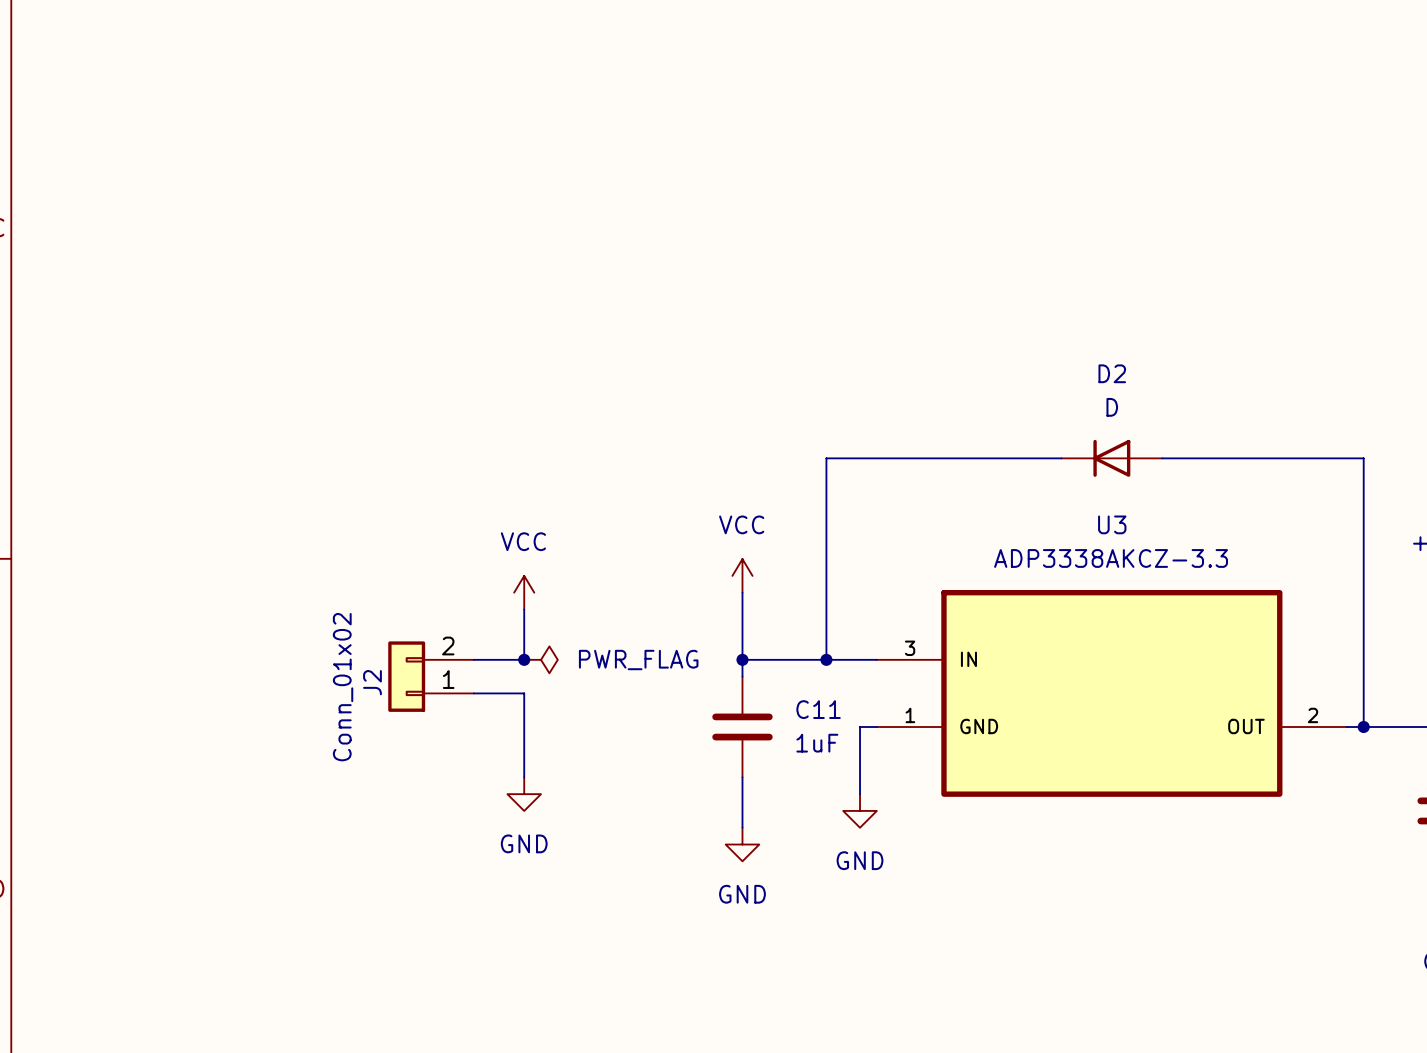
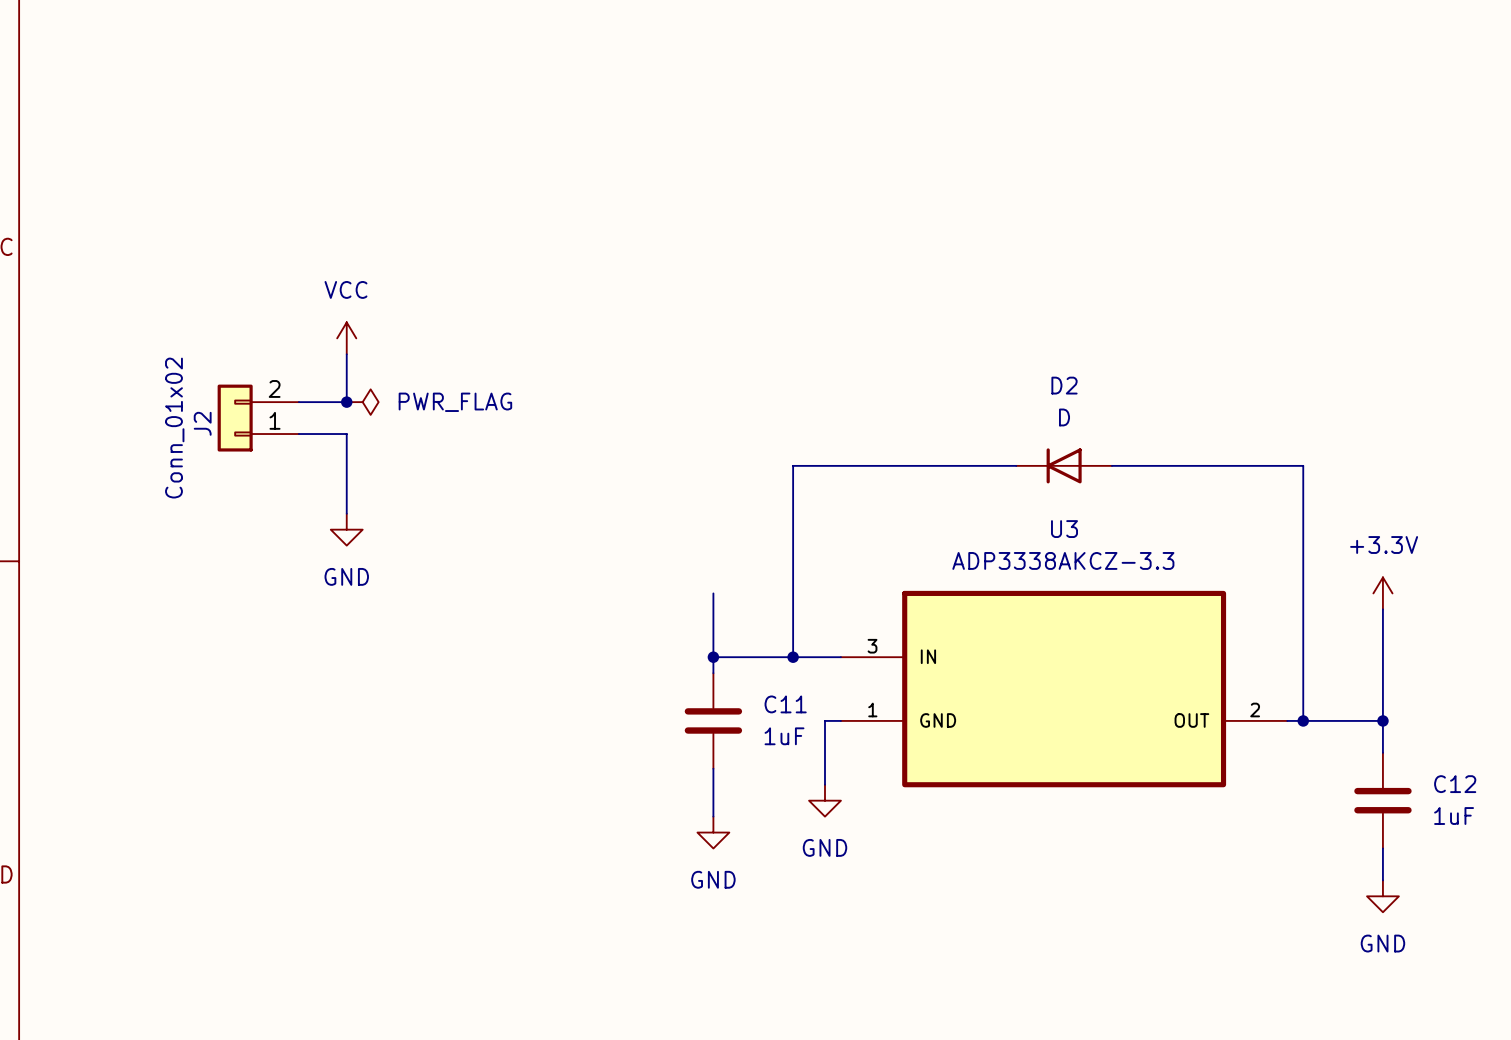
power symbol: none -> VCC (346, 338)
junction: none -> (346, 402)
power symbol: VCC (742, 575) -> none
power symbol: VCC (524, 592) -> none
wire: (524, 609) (524, 659) (473, 659) -> (346, 354) (346, 402) (298, 402)
junction: (524, 659) -> none
power symbol position: PWR_FLAG (541, 659) -> PWR_FLAG (362, 402)
J2 position: (431, 676) -> (258, 418)
wire: (473, 693) (524, 693) (524, 777) -> (298, 434) (346, 434) (346, 513)
power symbol position: GND (524, 794) -> GND (346, 529)

